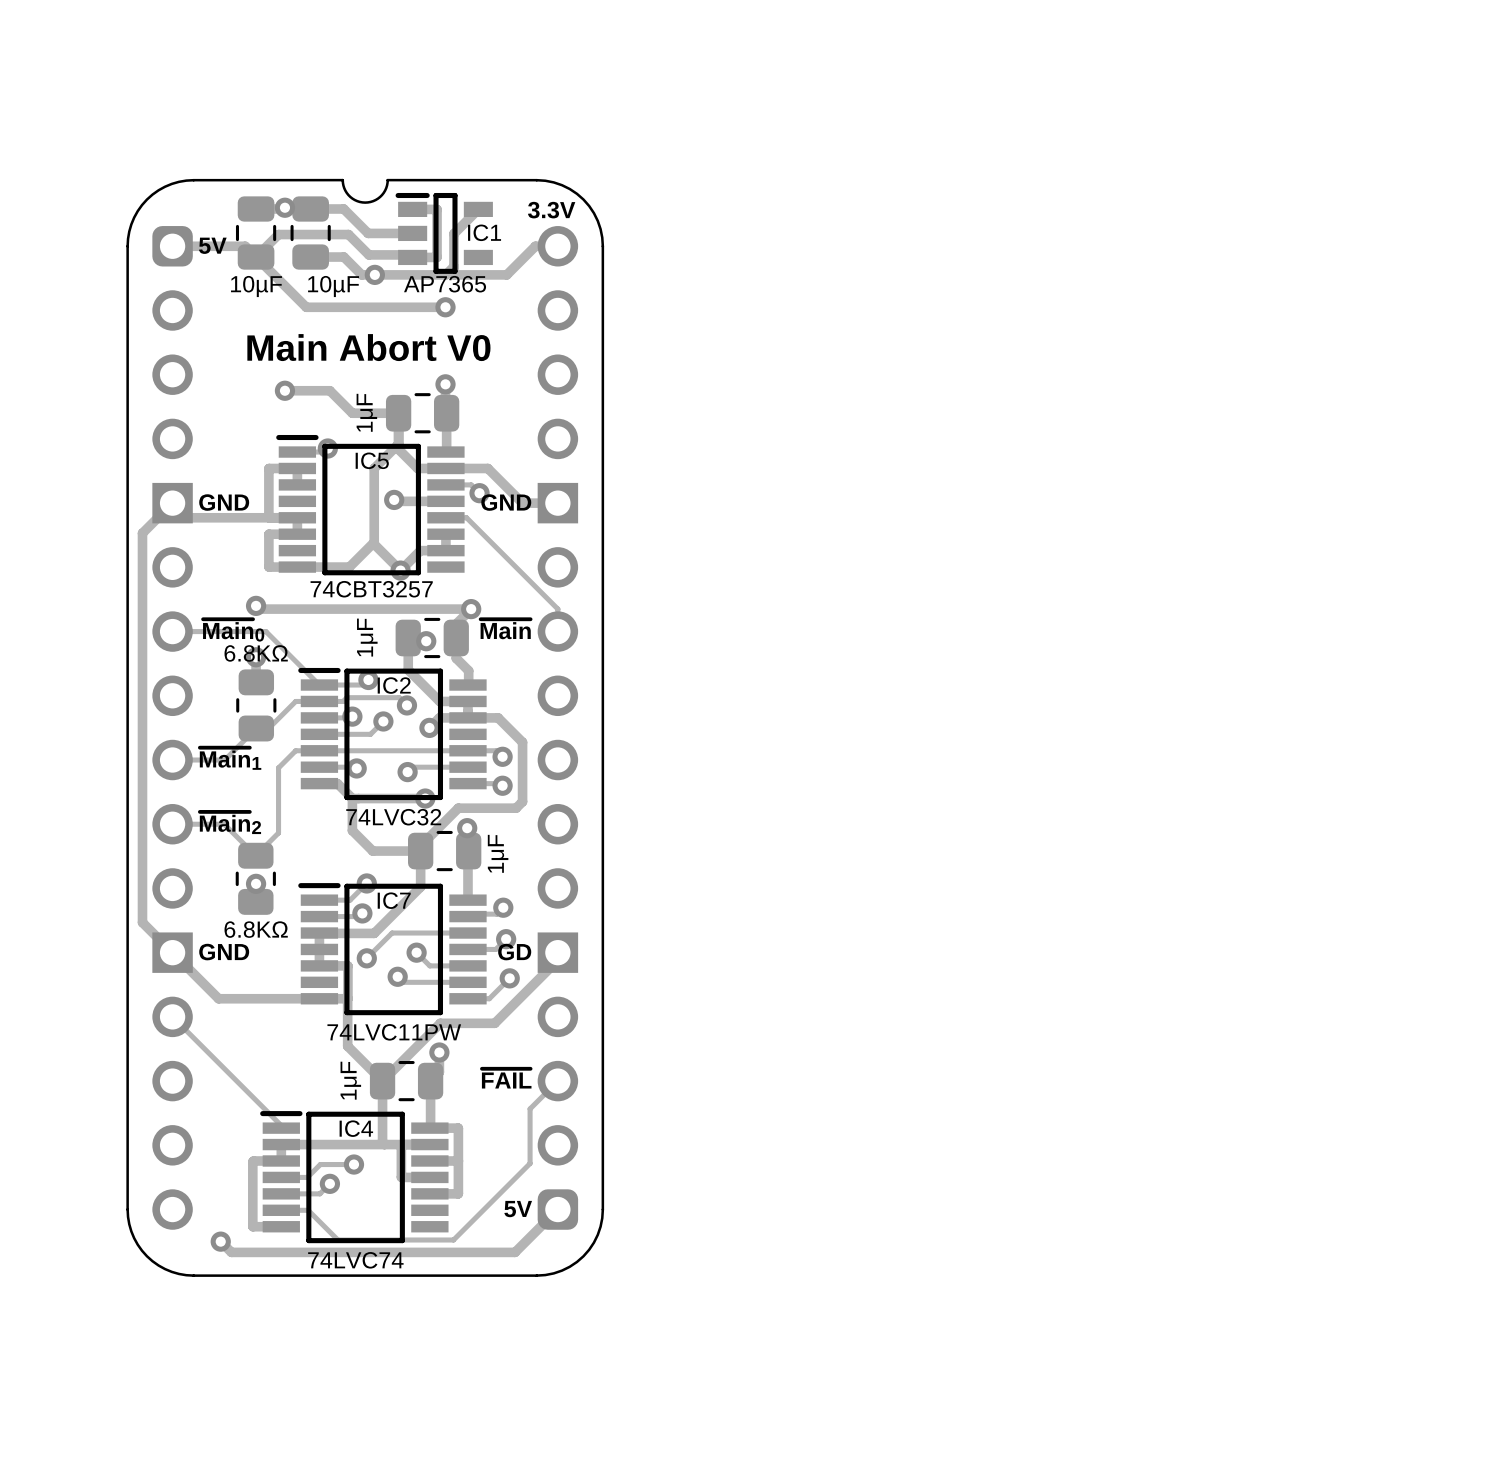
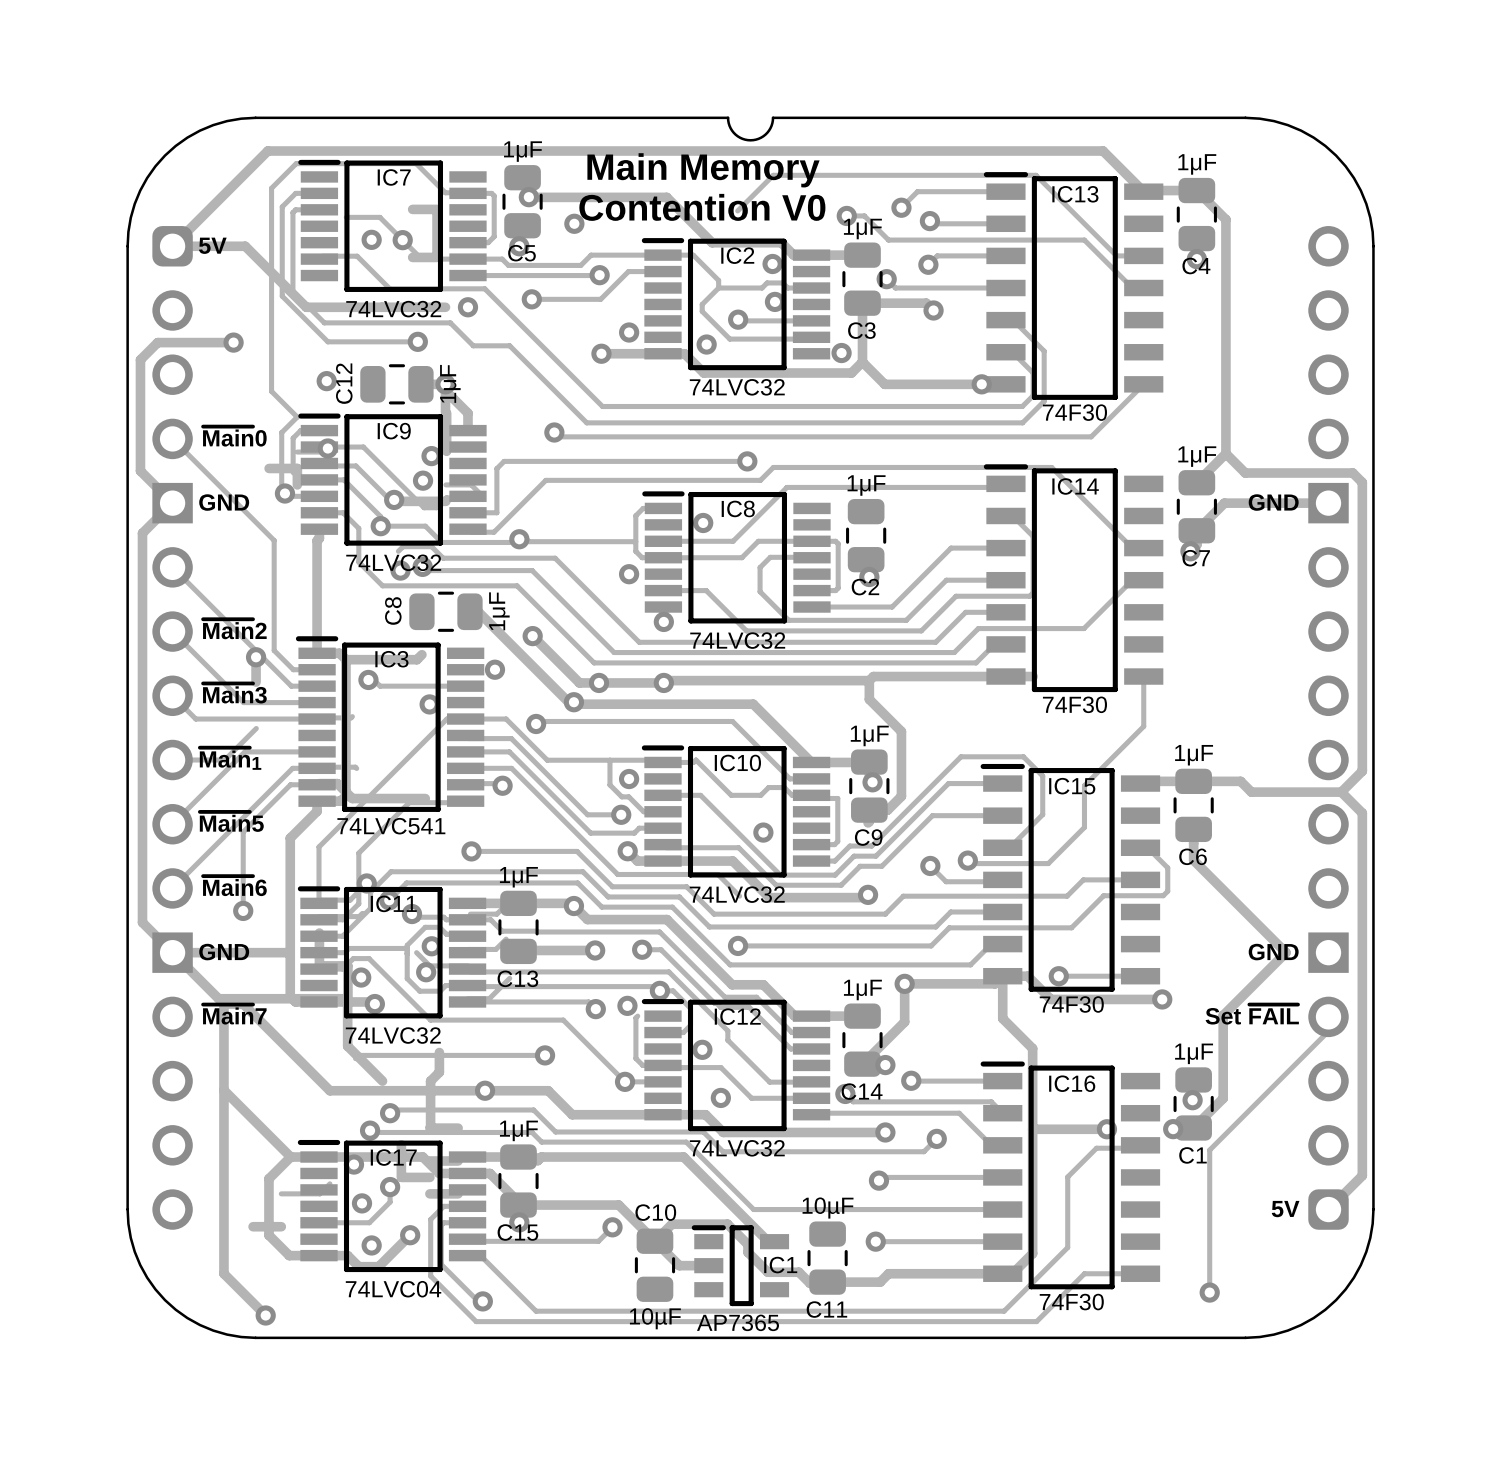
board edge: none -> (255, 117) (728, 117) (733, 132) (742, 138) (750, 140) (758, 138) (767, 132) (773, 117) (1245, 117) (1274, 121) (1287, 125) (1313, 137) (1336, 155) (1353, 178) (1366, 203) (1372, 231) (1373, 246) (1373, 1209) (1370, 1237) (1360, 1265) (1345, 1289) (1336, 1300) (1325, 1309) (1301, 1325) (1274, 1334) (1245, 1337) (255, 1337) (227, 1334) (200, 1325) (175, 1309) (165, 1300) (147, 1277) (134, 1251) (128, 1223) (127, 1209) (128, 231) (130, 217) (140, 190) (147, 178) (165, 155) (187, 137) (200, 130) (227, 121) (255, 117)
text: none -> Main Memory (703, 170)
track: none -> (1144, 190) (1196, 190) (1225, 219) (1225, 453)
track: none -> (1005, 191) (917, 191) (901, 207)
track: none -> (1143, 191) (1103, 151) (267, 151) (172, 246)
track: none -> (467, 192) (445, 192) (416, 163) (296, 163) (271, 188) (271, 391) (297, 417) (281, 432) (281, 490) (287, 496) (319, 496)
track: none -> (319, 193) (295, 193) (282, 206) (282, 296) (327, 341) (417, 341)
track: none -> (467, 193) (491, 193) (494, 195) (494, 236) (488, 242) (467, 242)
via: none -> (528, 197)
track: none -> (529, 197) (666, 197) (712, 242) (781, 242) (793, 255) (862, 255)
C5: none -> 1μF (522, 201)
via: (284, 207) -> none
text: none -> Contention V0 (702, 207)
via: none -> (901, 207)
track: (256, 209) (343, 209) (368, 233) (412, 233) -> none
track: none -> (319, 209) (295, 209) (292, 212) (292, 291) (324, 322) (450, 322) (473, 345) (509, 345) (586, 422) (1022, 422) (1044, 401) (1044, 351) (1013, 320)
track: (478, 209) (453, 233) (453, 274) (506, 274) (535, 246) (557, 246) -> none
text: 3.3V (551, 210) -> none
track: none -> (737, 210) (773, 175) (1036, 175) (1116, 255) (1135, 255)
C4: none -> 1μF (1196, 214)
track: none -> (846, 215) (864, 215) (888, 240) (1084, 240) (1132, 288)
via: none -> (846, 215)
track: none -> (346, 217) (379, 217) (421, 259) (502, 259) (508, 265) (580, 265) (591, 255) (693, 255) (718, 280) (718, 288)
track: none -> (929, 221) (932, 223) (1005, 223)
via: none -> (929, 221)
via: none -> (574, 223)
part: 10µF (256, 233) -> none
part: 10µF (310, 233) -> none
IC1 position: (444, 233) -> (740, 1265)
via: none -> (371, 239)
via: none -> (402, 240)
via: none -> (519, 246)
track: (410, 254) (368, 254) (348, 234) (278, 234) (256, 257) -> none
track: none -> (1005, 255) (937, 255) (928, 264)
track: none -> (322, 256) (357, 256) (389, 288) (484, 288) (602, 406) (1022, 406) (1033, 395) (1033, 372) (1012, 352)
track: (310, 257) (343, 257) (361, 274) (445, 274) (453, 266) -> none
via: none -> (1196, 259)
via: none -> (772, 263)
via: none -> (928, 264)
track: none -> (662, 271) (628, 271) (600, 299) (531, 299)
via: (374, 274) -> none
track: none -> (599, 275) (467, 275)
via: none -> (599, 275)
C3: none -> 1μF (862, 279)
track: none -> (886, 279) (895, 288) (1005, 288)
via: none -> (886, 279)
IC1 text: AP7365 (445, 284) -> none
IC13: none -> (1073, 285)
track: none -> (718, 288) (762, 288) (767, 282) (782, 282) (787, 288) (811, 288)
track: none -> (718, 288) (702, 304) (702, 311) (729, 339) (809, 339)
via: none -> (531, 299)
via: none -> (774, 301)
via: (445, 307) -> none
via: none -> (467, 307)
track: none -> (933, 310) (926, 303) (862, 303) (862, 362)
via: none -> (933, 310)
track: none -> (738, 319) (811, 320)
via: none -> (738, 319)
via: none -> (629, 332)
via: none -> (417, 341)
track: none -> (233, 342) (157, 342) (140, 359) (140, 471) (172, 503)
via: none -> (233, 342)
via: none -> (706, 344)
text: Main Abort V0 (368, 347) -> none
track: none -> (601, 353) (684, 353) (703, 372) (851, 372) (862, 362)
via: none -> (601, 353)
via: none -> (841, 353)
track: none -> (862, 362) (884, 384) (1005, 384)
via: none -> (326, 381)
C12: none -> 1μF (396, 384)
track: none -> (420, 384) (439, 384) (467, 413) (467, 430)
via: none -> (981, 384)
track: none -> (1143, 384) (1091, 436) (558, 436) (554, 432)
track: (284, 390) (329, 390) (352, 413) (398, 413) (398, 449) (417, 468) (487, 468) (522, 503) (557, 503) -> none
via: (284, 390) -> none
part: 1μF (422, 413) -> none
track: none -> (319, 430) (300, 430) (293, 438) (293, 472) (300, 479) (343, 479) (380, 516) (380, 526) (425, 526) (441, 542) (516, 542) (519, 539) (526, 539) (528, 541) (635, 541)
via: none -> (554, 432)
text: none -> ~{Main}0 (234, 436)
track: none -> (172, 438) (274, 540) (274, 650) (293, 669) (317, 669)
track: (398, 444) (374, 468) (374, 544) (400, 570) (420, 550) (445, 550) (445, 534) -> none
track: none -> (319, 447) (363, 447) (424, 507) (436, 507) (446, 497) (467, 497)
track: none -> (1225, 453) (1245, 473) (1352, 473) (1362, 482) (1362, 771) (1341, 792)
track: none -> (1225, 453) (1196, 482)
via: none -> (431, 456)
track: none -> (747, 461) (504, 461) (496, 468) (496, 512) (467, 512)
via: none -> (747, 461)
track: none -> (321, 466) (355, 466) (391, 501)
track: (268, 468) (268, 517) -> none
IC9: none -> (392, 479)
via: none -> (423, 480)
track: none -> (1002, 487) (786, 487) (733, 541) (663, 541)
via: none -> (284, 493)
via: (479, 493) -> none
text: GND (506, 502) -> none
text: none -> GND (1273, 502)
track: none -> (1328, 503) (1224, 503) (1196, 530) (1196, 544) (1190, 551)
IC5: (370, 505) -> none
C7: none -> 1μF (1196, 506)
track: none -> (663, 508) (643, 508) (635, 515) (635, 551) (642, 557) (741, 557) (758, 541) (835, 541) (838, 543) (838, 588) (835, 590) (811, 590)
track: none -> (319, 512) (343, 512) (358, 528) (358, 562) (382, 585) (517, 585) (594, 662) (976, 662) (994, 644)
track: none -> (1012, 515) (1033, 536) (1033, 592) (1029, 596) (956, 596) (921, 630) (746, 630) (706, 590) (663, 590)
track: (187, 517) (297, 517) (297, 534) (269, 534) -> none
track: (445, 517) (466, 517) (557, 609) (557, 631) -> none
via: none -> (703, 522)
via: none -> (380, 526)
track: none -> (319, 529) (319, 538) (317, 540) (317, 653) (339, 653) (345, 659)
track: none -> (470, 532) (493, 532) (545, 480) (760, 480) (773, 467) (1051, 467) (1132, 548)
track: (268, 534) (268, 566) -> none
C2: none -> 1μF (866, 535)
via: none -> (519, 539)
track: (374, 542) (349, 567) (269, 567) -> none
track: none -> (1005, 548) (951, 548) (892, 607) (811, 607)
track: none -> (398, 551) (403, 546) (431, 546) (443, 558) (555, 558) (639, 642) (935, 642) (965, 612) (1005, 612)
via: none -> (1190, 551)
IC8: none -> (736, 557)
track: none -> (811, 557) (770, 557) (760, 567) (760, 591) (788, 620) (906, 620) (946, 580) (1005, 580)
track: none -> (422, 566) (426, 570) (532, 570) (614, 652) (954, 652) (978, 628) (1083, 628) (1132, 580)
via: none -> (422, 566)
track: none -> (172, 567) (291, 686) (317, 686)
via: none -> (629, 574)
via: none -> (869, 576)
IC14: none -> (1073, 578)
track: (256, 605) (259, 609) (471, 609) (456, 624) (456, 658) (468, 670) (468, 684) -> none
via: (256, 605) -> none
via: (471, 609) -> none
C8: none -> 1μF (445, 611)
track: none -> (469, 611) (478, 611) (568, 702) (575, 704) (753, 704) (811, 762) (868, 762)
via: none -> (663, 621)
text: ~{Main} (505, 629) -> none
text: ~{Main}0 (233, 630) -> ~{Main}2 (234, 629)
track: (172, 631) (265, 631) (319, 685) (363, 685) (368, 679) -> (172, 631) (243, 702) (317, 702)
track: none -> (532, 636) (579, 682) (663, 682) (666, 680) (869, 680)
via: none -> (532, 636)
part: 1μF (432, 638) -> none
track: (426, 641) (423, 638) (408, 638) (408, 669) (439, 701) (467, 701) (467, 717) -> none
via: (426, 641) -> none
track: none -> (421, 654) (416, 659) (345, 659)
track: none -> (345, 659) (345, 795) (340, 801) (317, 801) (317, 811) (290, 838) (290, 996) (295, 1001) (372, 1001) (374, 1004)
via: none -> (494, 669)
track: none -> (1033, 676) (873, 676) (869, 680)
track: none -> (1143, 676) (1143, 726) (1084, 785) (1084, 827) (1048, 863) (970, 863) (967, 860)
track: none -> (374, 680) (380, 686) (465, 686)
track: none -> (869, 680) (869, 699) (901, 731) (901, 796) (887, 810) (869, 810) (868, 822)
via: none -> (599, 682)
via: none -> (663, 682)
text: none -> ~{Main}3 (234, 693)
track: none -> (172, 695) (195, 719) (317, 719)
via: none -> (573, 702)
via: none -> (429, 704)
part: 6.8KΩ (256, 705) -> none
track: (406, 705) (399, 697) (346, 697) (343, 701) (295, 701) (268, 728) -> none
via: (406, 705) -> none
via: (352, 716) -> none
track: (383, 721) (370, 734) (319, 734) -> none
via: (383, 721) -> none
track: none -> (536, 723) (538, 721) (732, 721) (790, 778) (811, 778)
via: none -> (536, 723)
IC3: none -> (390, 724)
part: none -> (172, 727)
part: (365, 727) -> none
track: (429, 727) (439, 717) (498, 717) (522, 742) (522, 801) (516, 808) (458, 808) (420, 845) -> none
via: (429, 727) -> none
part: none -> (1328, 727)
IC2 position: (392, 734) -> (736, 304)
track: none -> (468, 738) (511, 738) (587, 814) (621, 814)
track: none -> (465, 751) (509, 751) (590, 833) (634, 833) (639, 828) (662, 828)
track: (502, 756) (496, 750) (295, 750) (278, 767) (278, 833) (255, 855) (224, 824) (172, 824) -> (317, 751) (244, 751) (172, 824)
via: (502, 756) -> none
track: none -> (609, 760) (609, 784) (621, 796) (628, 796) (643, 811) (662, 811)
track: none -> (660, 760) (547, 760) (506, 719) (446, 719) (318, 846) (318, 903)
track: none -> (662, 762) (693, 762) (695, 760) (731, 795) (760, 795) (768, 787) (784, 787) (792, 795) (811, 795)
track: (467, 767) (412, 767) (407, 772) -> none
track: none -> (317, 768) (292, 768) (172, 888)
via: (356, 768) -> none
track: none -> (465, 768) (511, 768) (617, 874) (717, 874) (739, 896)
via: (407, 772) -> none
via: none -> (629, 779)
track: none -> (1142, 781) (1240, 781) (1251, 792) (1341, 792)
via: none -> (872, 782)
track: none -> (1002, 783) (948, 783) (875, 856) (854, 856) (835, 875) (780, 875) (700, 795) (662, 795)
track: none -> (317, 784) (290, 784) (243, 832) (243, 910)
C9: none -> 1μF (869, 786)
track: none -> (1341, 792) (1362, 813) (1362, 1175) (1328, 1209)
track: (352, 798) (352, 830) (372, 851) (420, 851) (420, 886) (374, 933) (319, 933) -> none
via: (425, 798) -> none
track: none -> (814, 798) (837, 798) (837, 841) (834, 844) (811, 844)
track: none -> (467, 802) (409, 802) (358, 853) (358, 903) (342, 919) (318, 919)
C6: none -> 1μF (1193, 805)
IC10: none -> (736, 811)
via: none -> (621, 814)
track: none -> (1002, 815) (932, 815) (881, 866) (860, 866) (841, 885) (776, 885) (738, 847) (666, 847)
text: ~{Main}2 (230, 822) -> ~{Main}5 (231, 821)
via position: (467, 828) -> (471, 851)
track: none -> (1193, 829) (1193, 860) (1285, 952) (1223, 1015) (1223, 1098) (1193, 1128) (1173, 1129)
via: none -> (763, 832)
track: none -> (1009, 847) (1042, 814) (1042, 776) (1023, 756) (961, 756) (871, 846) (849, 846) (834, 861) (811, 861)
track: none -> (1147, 847) (1167, 867) (1167, 891) (1163, 895) (1103, 895) (1071, 927) (949, 927) (931, 945) (738, 945)
part: 1μF (444, 851) -> none
track: (467, 851) (467, 900) -> none
track: none -> (471, 851) (577, 851) (612, 886) (686, 886) (714, 914) (885, 914) (903, 896) (1067, 896) (1083, 879) (1140, 879)
track: none -> (627, 851) (637, 861) (732, 861) (769, 897) (865, 897) (868, 894)
via: none -> (627, 851)
via: none -> (967, 860)
track: none -> (930, 865) (946, 881) (1000, 881)
via: none -> (930, 865)
IC15: none -> (1070, 877)
part: 6.8KΩ (255, 878) -> none
via position: (256, 883) -> (243, 910)
text: none -> ~{Main}6 (234, 886)
via: none -> (868, 894)
track: none -> (389, 900) (406, 882) (577, 882) (601, 907) (672, 907) (730, 964) (970, 964) (991, 944)
via: none -> (389, 900)
track: none -> (467, 903) (571, 903) (587, 919) (666, 919) (732, 984) (763, 984) (794, 1016) (862, 1016)
via: none -> (573, 906)
via: (503, 907) -> none
track: none -> (1002, 911) (950, 911) (935, 926) (709, 926) (679, 896) (608, 896) (582, 871) (391, 871) (370, 892) (370, 908) (342, 936) (318, 936)
via: (362, 913) -> none
track: none -> (411, 914) (417, 919) (419, 917) (443, 917) (446, 919) (490, 919) (502, 931) (659, 931) (724, 997) (756, 997) (791, 1032) (811, 1032)
via: none -> (411, 914)
C13: none -> 1μF (518, 927)
track: (467, 933) (392, 933) (366, 958) -> none
track: none -> (465, 934) (446, 934) (439, 927) (425, 927) (407, 945) (407, 978) (419, 991) (440, 991) (445, 985) (467, 985)
via: (506, 939) -> none
via: none -> (738, 945)
via: none -> (431, 946)
track: none -> (407, 948) (349, 948) (344, 952) (318, 952)
IC7 position: (392, 949) -> (392, 225)
track: none -> (642, 949) (661, 949) (720, 1007) (749, 1007) (790, 1048) (811, 1048)
via: none -> (642, 949)
track: none -> (519, 950) (595, 950)
via: none -> (595, 950)
track: none -> (172, 952) (290, 952)
IC11: none -> (392, 952)
via: (416, 952) -> none
text: GD (514, 952) -> none
text: none -> GND (1273, 952)
via position: (366, 958) -> (361, 977)
track: (557, 960) (494, 1023) (440, 1023) (382, 1081) (382, 1142) (384, 1144) -> none
track: none -> (318, 969) (342, 969) (353, 958) (369, 958) (430, 1020) (563, 1020) (625, 1081) (662, 1081)
track: none -> (470, 971) (668, 971) (727, 1030) (727, 1040) (769, 1082) (811, 1082)
via: none -> (426, 972)
track: (397, 976) (403, 982) (467, 982) -> none
via: (397, 976) -> none
track: none -> (1002, 976) (1027, 976) (1050, 999) (1162, 999)
track: none -> (1002, 976) (995, 983) (904, 983) (904, 1021) (862, 1064) (885, 1065)
track: none -> (1002, 976) (1002, 1018) (1032, 1048) (1032, 1253) (1012, 1273)
track: none -> (1058, 976) (1140, 976)
via: none -> (1058, 976)
via: (509, 978) -> none
via: none -> (904, 983)
track: none -> (468, 986) (655, 986) (659, 990) (673, 990) (690, 1008) (690, 1025) (683, 1032) (662, 1032)
via: none -> (659, 990)
via: none -> (1162, 999)
track: none -> (467, 1001) (588, 1001) (595, 1009)
via: none -> (374, 1004)
via: none -> (627, 1005)
via: none -> (595, 1009)
text: none -> ~{Main}7 (234, 1014)
text: none -> Set ~{FAIL} (1252, 1014)
track: (172, 1016) (281, 1125) -> none
track: none -> (637, 1016) (635, 1017) (635, 1058) (642, 1065) (662, 1065)
track: none -> (1328, 1031) (1209, 1150) (1209, 1292)
IC7 text: 74LVC11PW (394, 1032) -> 74LVC32 (393, 309)
C14: none -> 1μF (862, 1040)
via: none -> (702, 1049)
via: (439, 1052) -> none
track: none -> (545, 1055) (358, 1055) (355, 1058)
via: none -> (545, 1055)
IC12: none -> (736, 1065)
via: none -> (885, 1065)
track: none -> (665, 1067) (720, 1067) (751, 1098) (811, 1098)
text: ~{FAIL} (506, 1078) -> none
via: none -> (911, 1080)
part: 1μF (406, 1081) -> none
track: (557, 1081) (530, 1108) (530, 1163) (453, 1240) (337, 1240) (308, 1210) (281, 1210) -> none
via: none -> (625, 1081)
track: none -> (911, 1081) (1002, 1081)
track: none -> (223, 1090) (290, 1157)
via: none -> (485, 1090)
track: none -> (845, 1093) (853, 1101) (991, 1101) (1002, 1113)
via: none -> (845, 1093)
via: none -> (720, 1097)
via: none -> (1192, 1100)
C1: none -> 1μF (1193, 1103)
track: none -> (390, 1113) (393, 1110) (533, 1110) (555, 1131) (703, 1131) (723, 1151) (923, 1151) (936, 1138)
via: none -> (390, 1113)
track: none -> (813, 1113) (959, 1113) (991, 1145)
track: (458, 1128) (458, 1160) -> none
track: none -> (1032, 1129) (1106, 1129)
via: none -> (1106, 1129)
via: none -> (1173, 1129)
track: none -> (370, 1130) (371, 1132) (532, 1132) (541, 1142) (686, 1142) (753, 1209) (1002, 1209)
via: none -> (370, 1130)
track: none -> (885, 1132) (723, 1132) (705, 1114) (572, 1114) (548, 1090) (329, 1090) (243, 1004) (223, 1004) (223, 1273) (265, 1315)
via: none -> (885, 1132)
via: none -> (936, 1138)
track: (438, 1144) (281, 1144) (281, 1160) (252, 1161) (252, 1226) -> none
track: none -> (1137, 1148) (1096, 1148) (1067, 1177) (1067, 1247) (1004, 1311) (536, 1311) (480, 1255)
track: none -> (290, 1157) (422, 1157) (439, 1173) (489, 1173) (518, 1201)
track: none -> (290, 1157) (268, 1178) (268, 1235) (289, 1255) (347, 1255) (358, 1266) (378, 1266) (410, 1235)
track: none -> (467, 1157) (534, 1157) (537, 1160) (541, 1157) (683, 1157) (768, 1241)
track: (458, 1161) (458, 1193) -> none
track: (353, 1164) (320, 1164) (307, 1177) (281, 1177) -> none
IC16: none -> (1070, 1175)
IC4: (354, 1177) -> none
track: none -> (1002, 1177) (882, 1177) (878, 1180)
via: none -> (878, 1180)
C15: none -> 1μF (518, 1181)
via: (329, 1183) -> none
track: none -> (390, 1187) (390, 1202) (369, 1222) (318, 1222)
via: none -> (390, 1187)
via: none -> (362, 1203)
IC17: none -> (392, 1206)
track: none -> (467, 1206) (443, 1206) (430, 1219) (430, 1276) (476, 1321) (1036, 1321) (1084, 1273) (1140, 1273)
text: 5V (518, 1209) -> none
track: (557, 1209) (515, 1252) (231, 1252) (220, 1241) -> none
text: none -> 5V (1285, 1209)
track: none -> (467, 1222) (443, 1222) (441, 1225) (441, 1264) (478, 1301) (482, 1301)
track: none -> (519, 1222) (518, 1205) (618, 1205) (679, 1265) (708, 1265)
via: none -> (519, 1222)
track: none -> (612, 1227) (598, 1241) (469, 1241)
via: none -> (612, 1227)
via: none -> (410, 1235)
via: (220, 1241) -> none
track: none -> (654, 1241) (672, 1224) (727, 1224) (748, 1244) (748, 1252) (767, 1272) (798, 1272) (810, 1283) (826, 1283)
track: none -> (875, 1241) (1002, 1241)
via: none -> (875, 1241)
via: none -> (371, 1245)
C11: none -> 10µF (827, 1258)
C10: none -> 10µF (654, 1265)
track: none -> (1002, 1273) (888, 1273) (880, 1282) (827, 1282)
via: none -> (1209, 1292)
via: none -> (482, 1301)
via: none -> (265, 1315)
IC1 text: none -> AP7365 (737, 1322)

